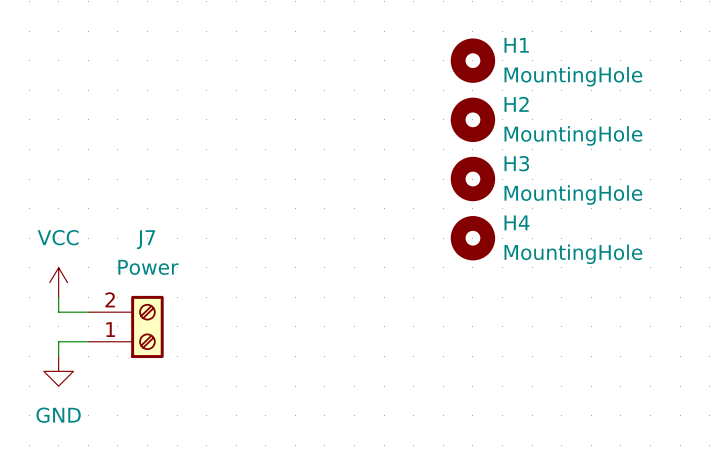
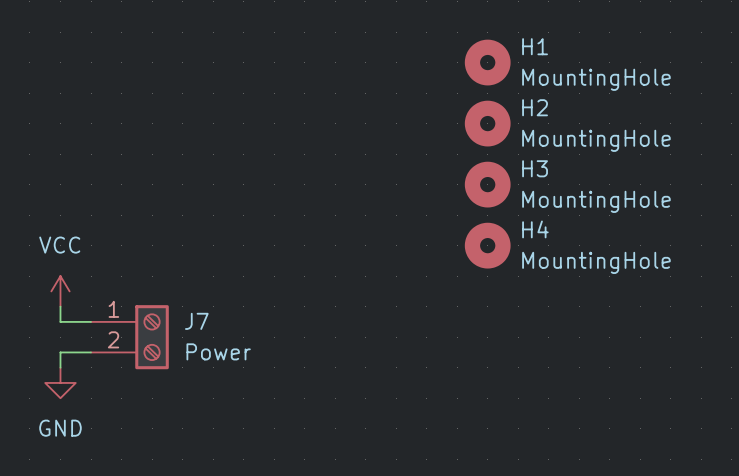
J7 name position: J7 (146, 239) -> J7 (196, 321)
J7 value position: Power (148, 267) -> Power (218, 351)
J7 flip: as is (147, 326) -> up-down (152, 337)

